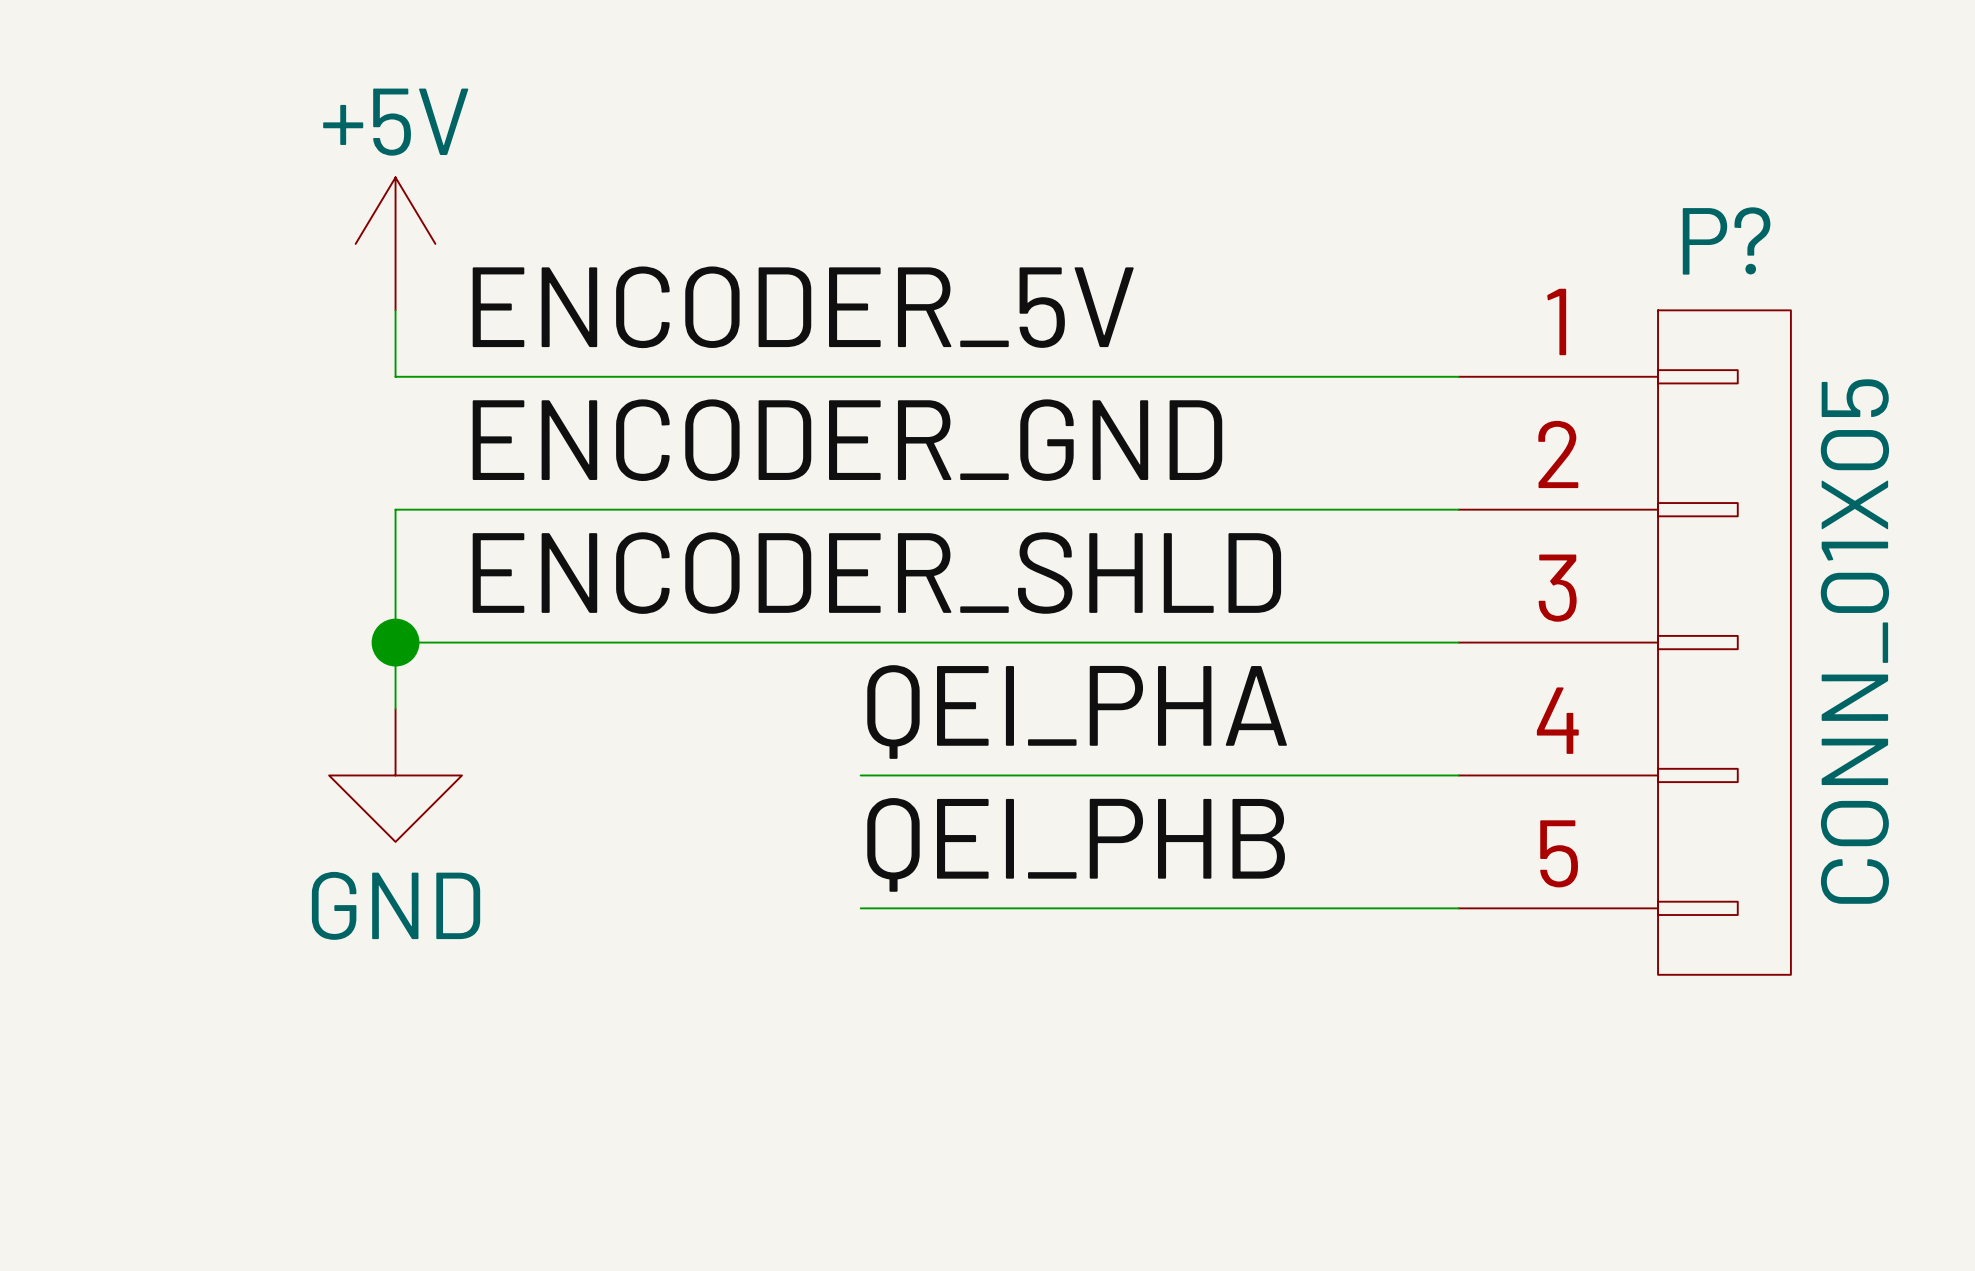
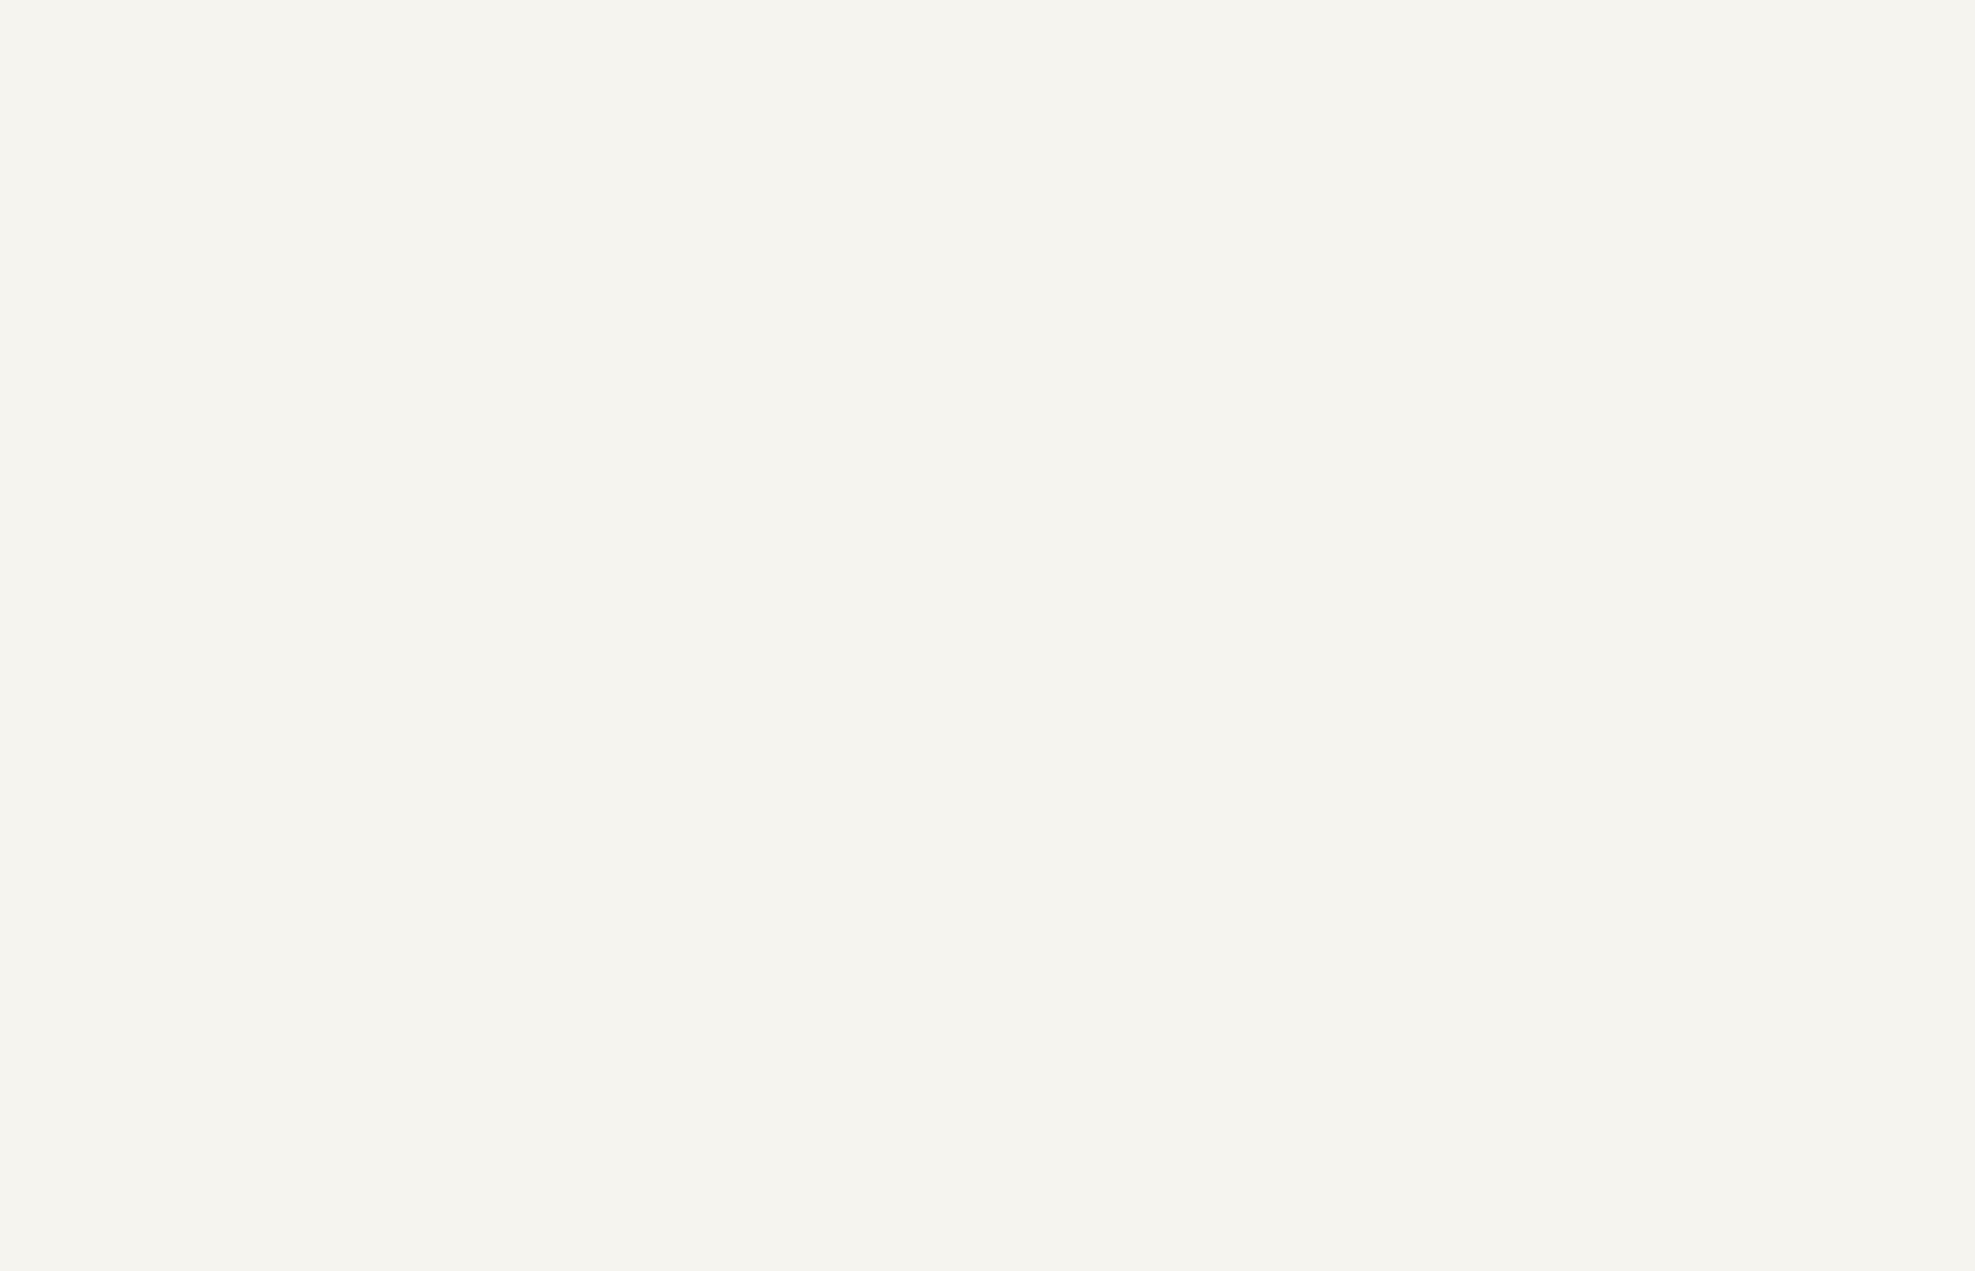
power symbol: +5V (395, 243) -> none
label: ENCODER_5V (803, 307) -> none
wire: (395, 310) (395, 376) (1458, 376) -> none
label: ENCODER_GND (847, 440) -> none
wire: (1458, 509) (395, 509) (395, 709) -> none
label: ENCODER_SHLD (876, 573) -> none
wire: (395, 642) (1458, 642) -> none
junction: (395, 642) -> none
P?: CONN_01X05 (1624, 642) -> none
label: QEI_PHA (1077, 712) -> none
power symbol: GND (395, 775) -> none
wire: (860, 775) (1458, 775) -> none
label: QEI_PHB (1076, 844) -> none
wire: (860, 908) (1458, 908) -> none

